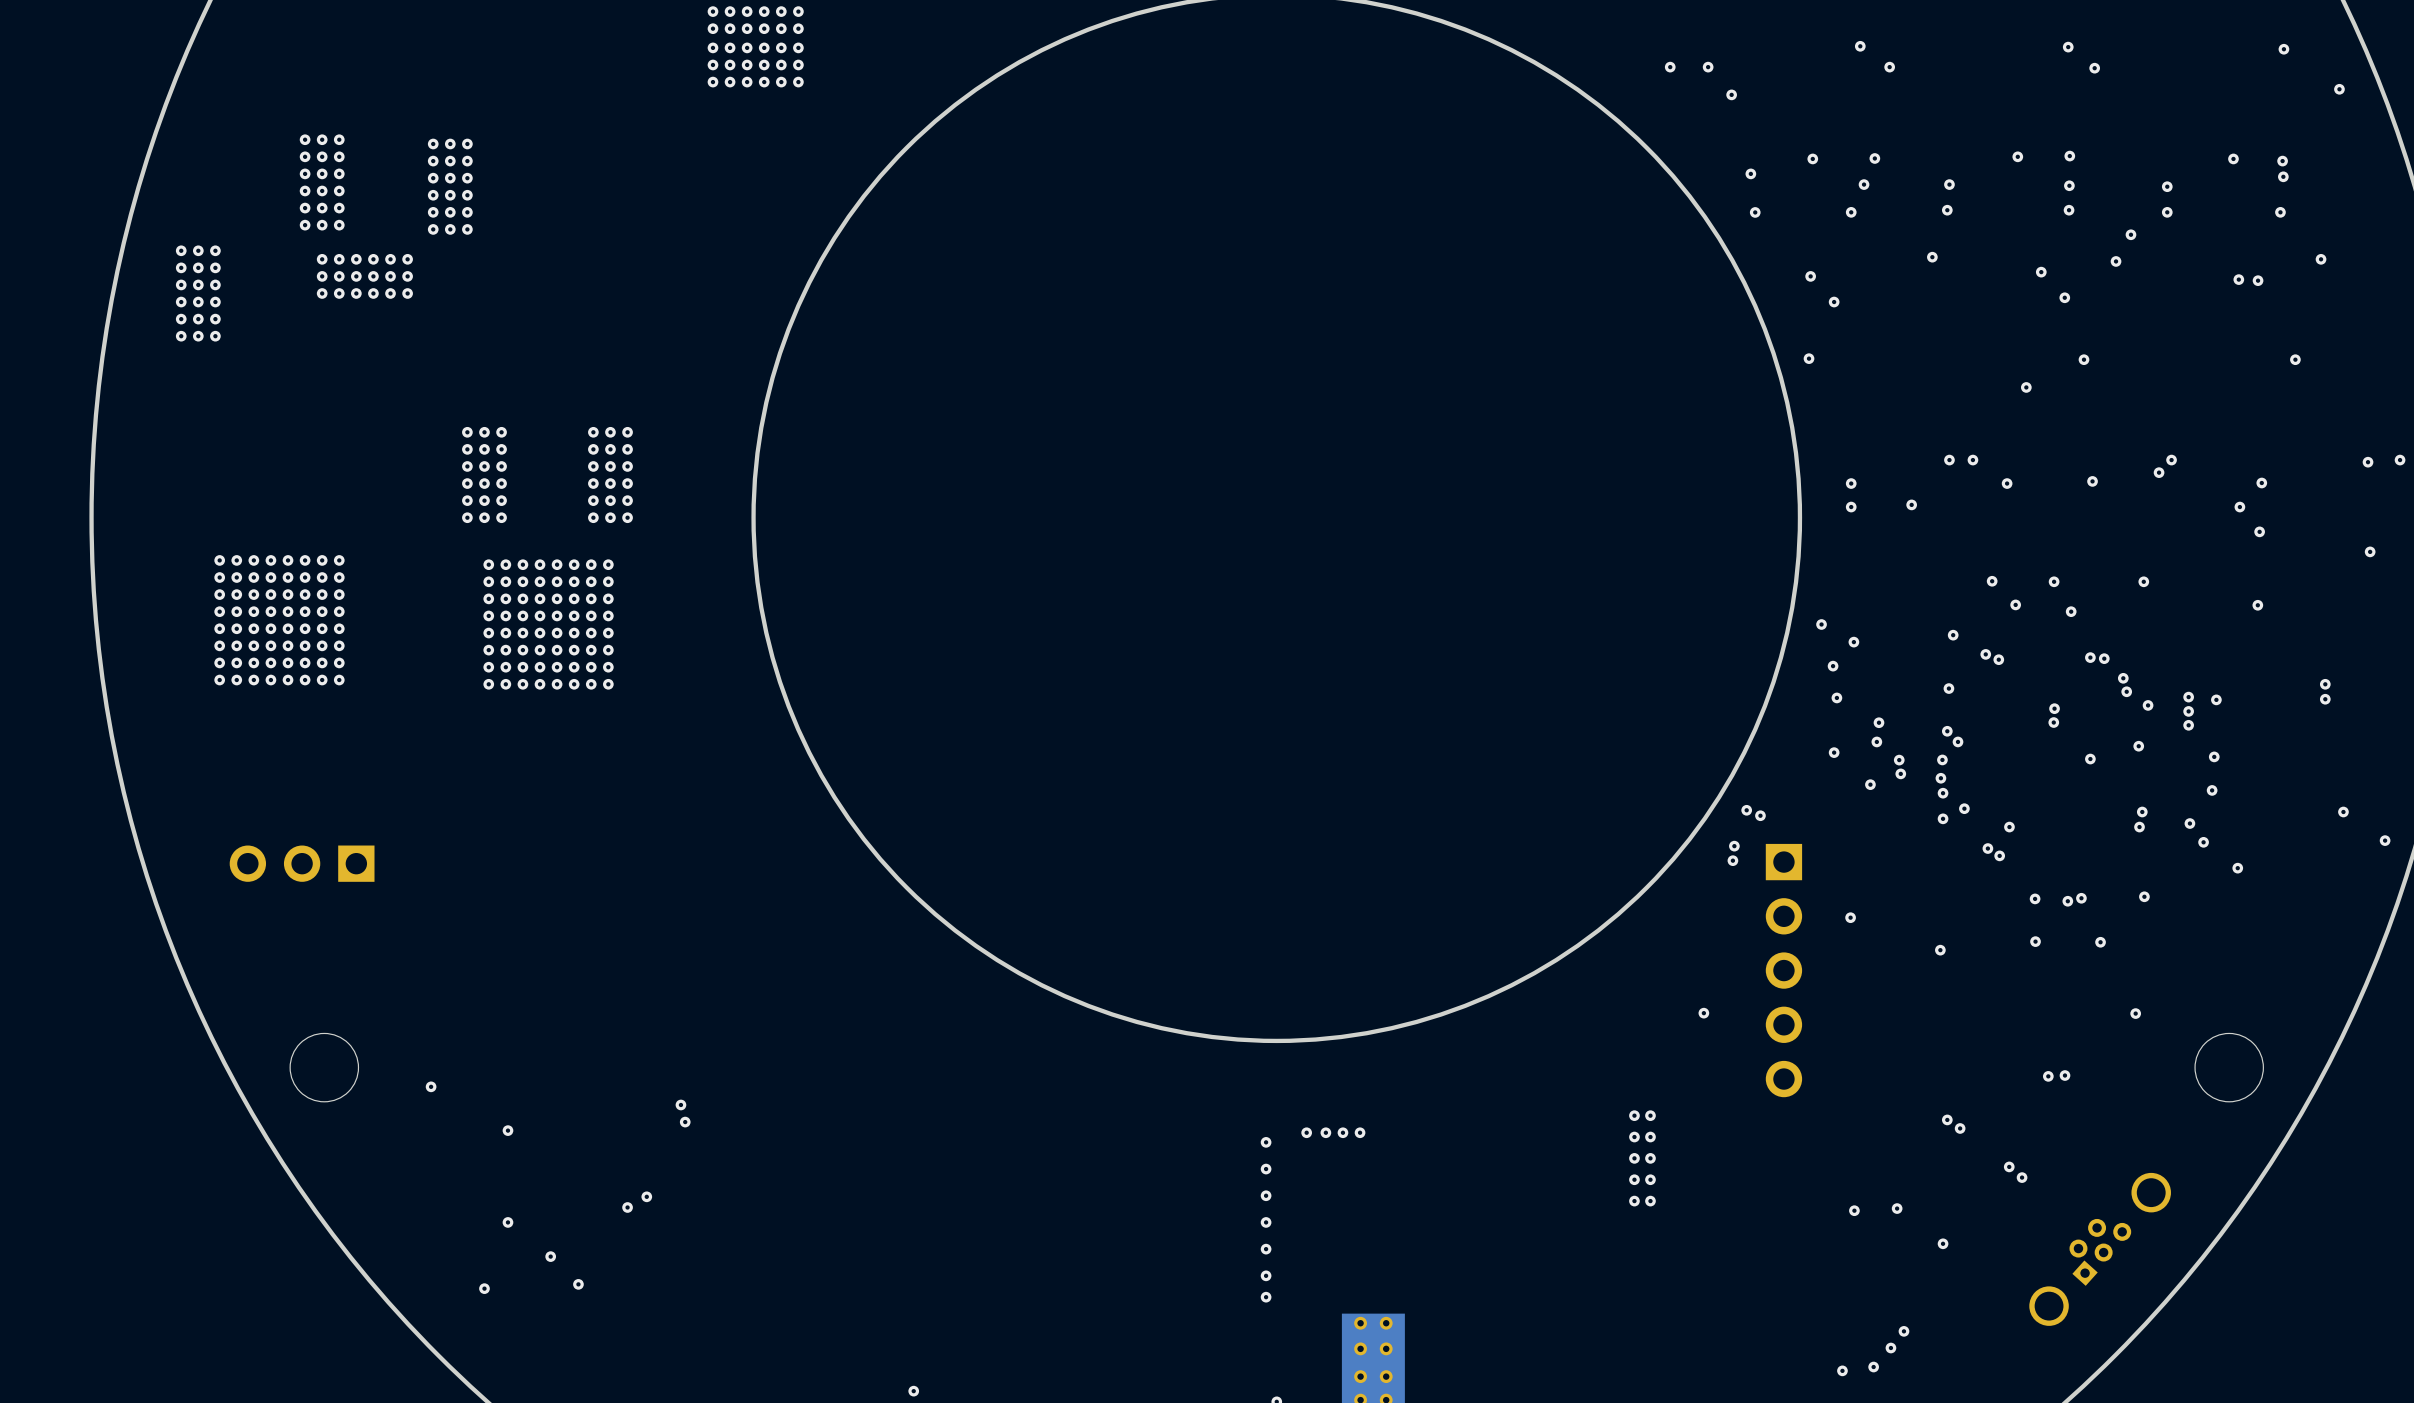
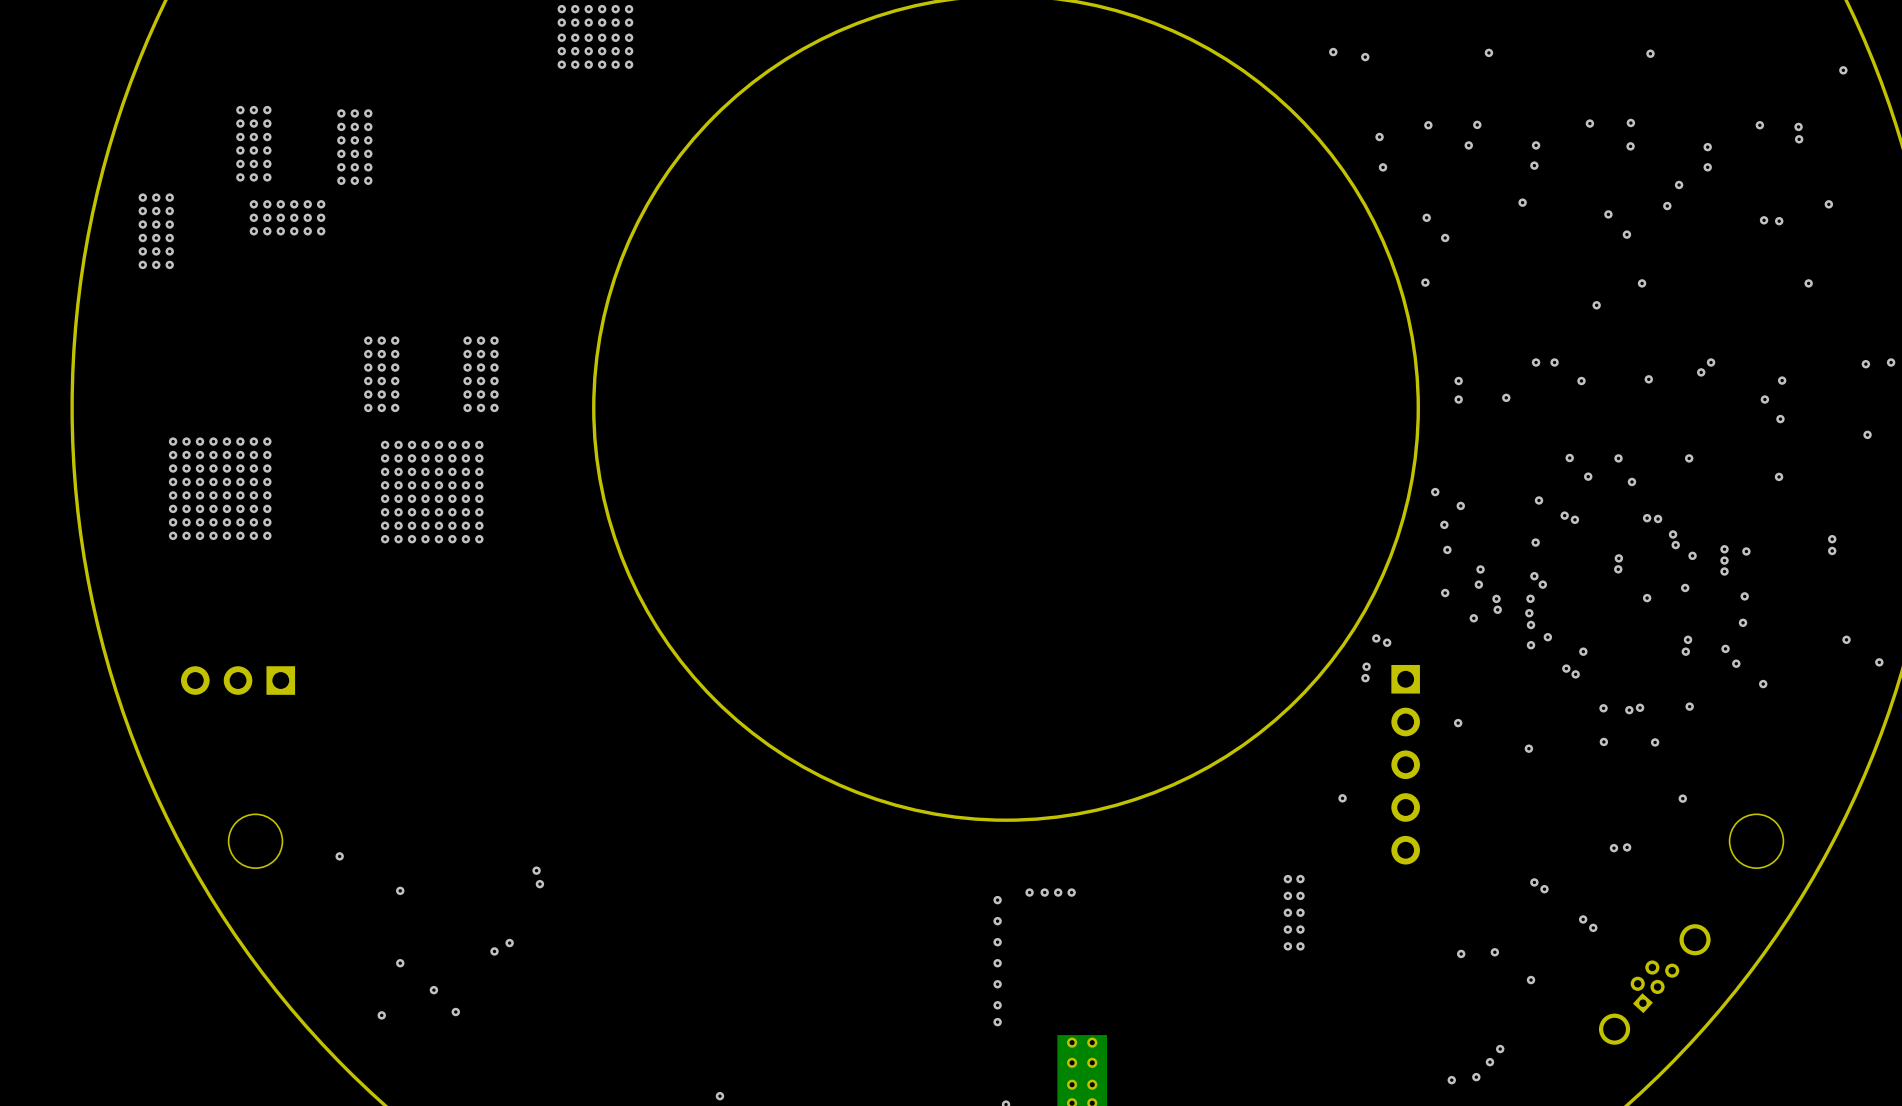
via: (1860, 46) -> none
via: (2068, 47) -> none
via: (2283, 49) -> none
via: none -> (1333, 52)
via: (1670, 67) -> none
via: (1708, 67) -> none
via: none -> (1365, 57)
via: (1731, 94) -> none
via: (2069, 210) -> none
via: (1851, 212) -> none
via: (2280, 212) -> none

